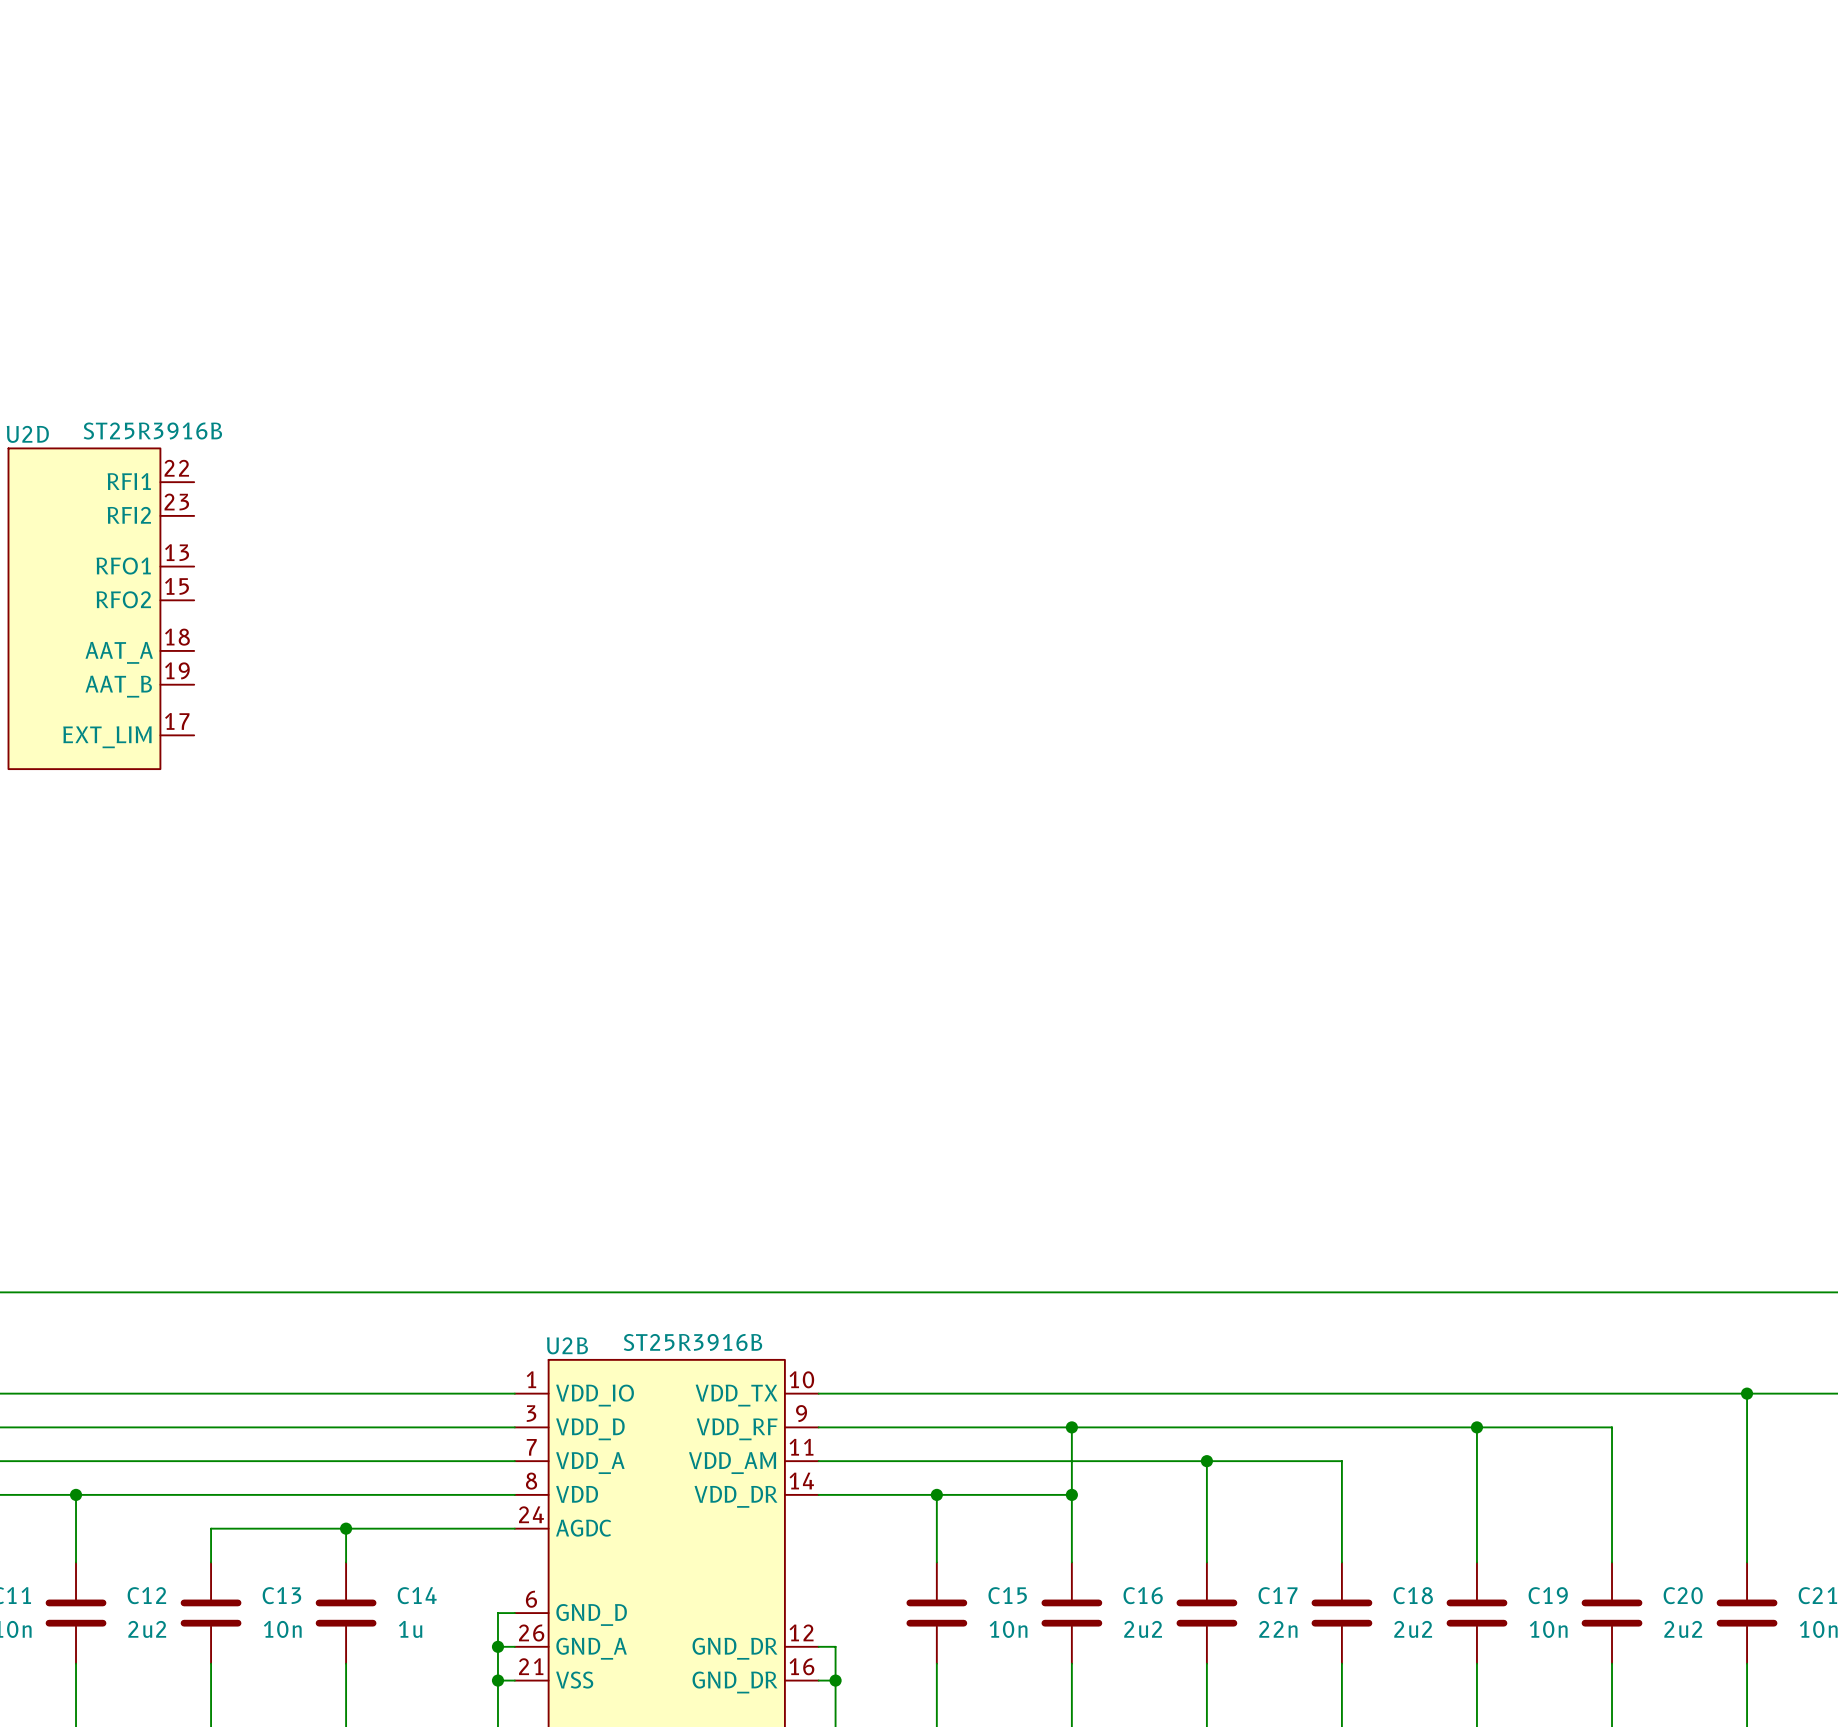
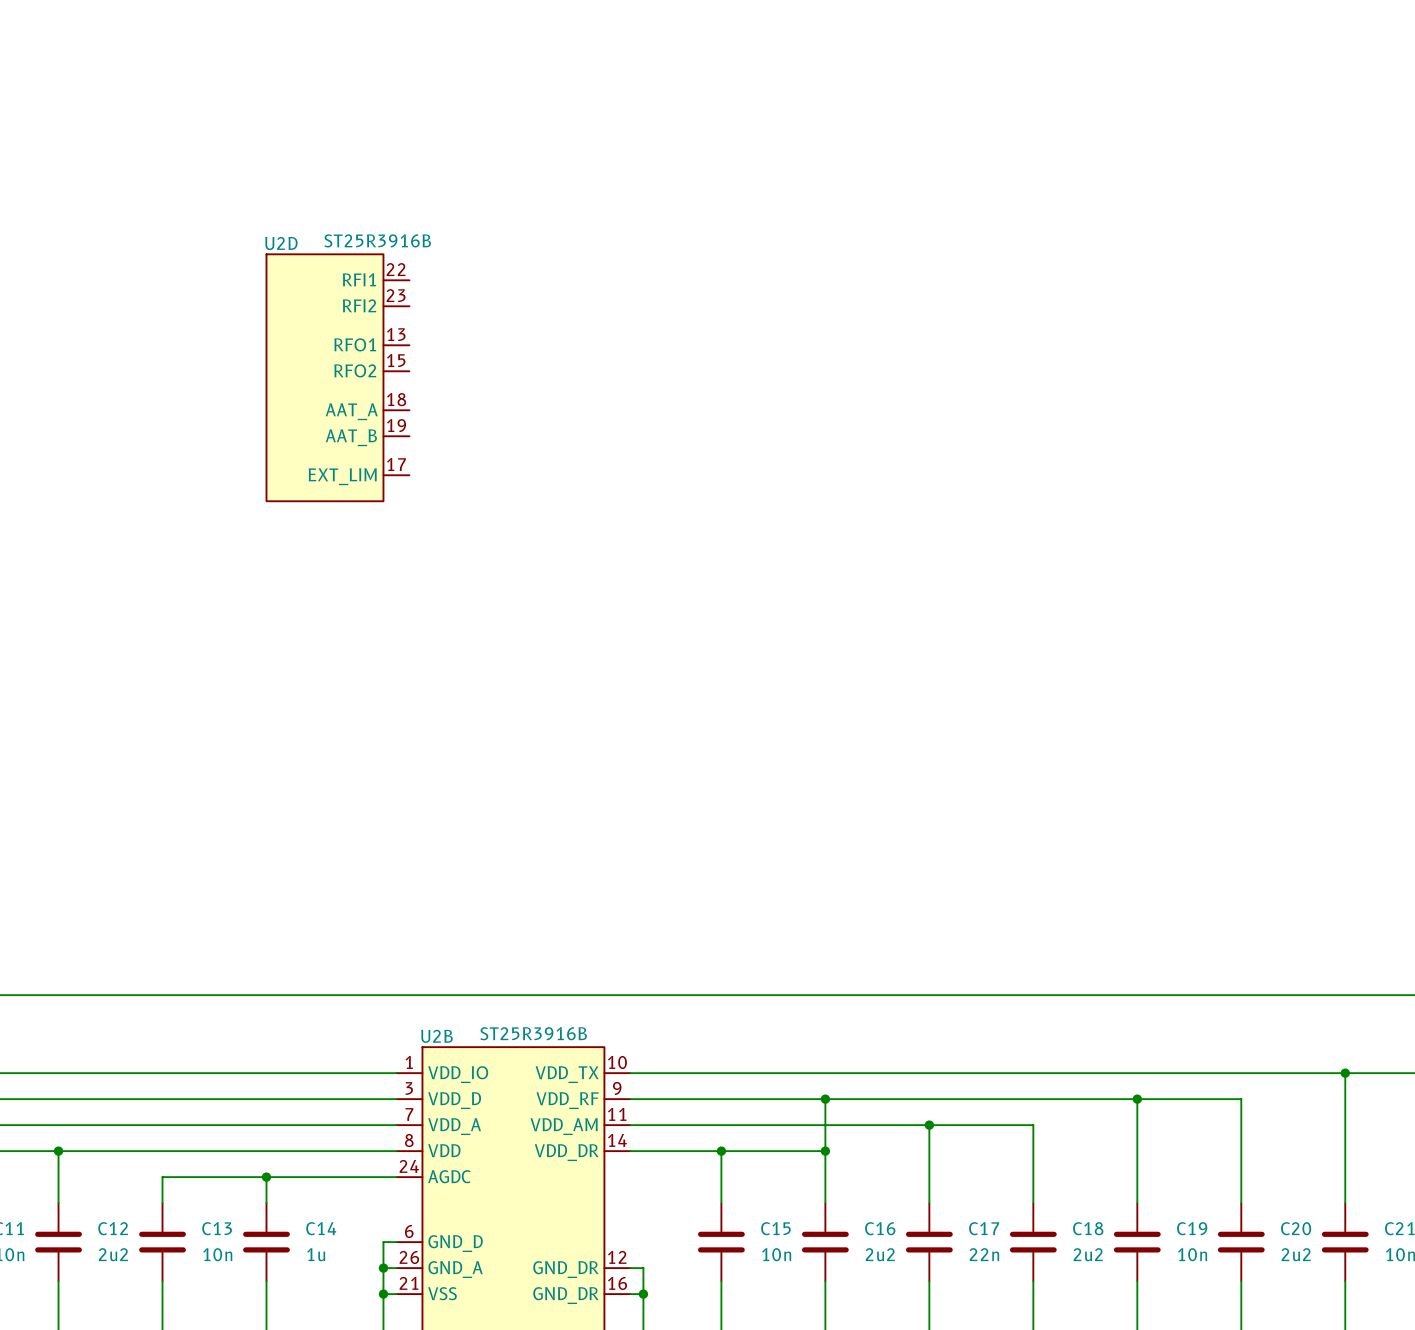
U2D position: (101, 608) -> (337, 377)

